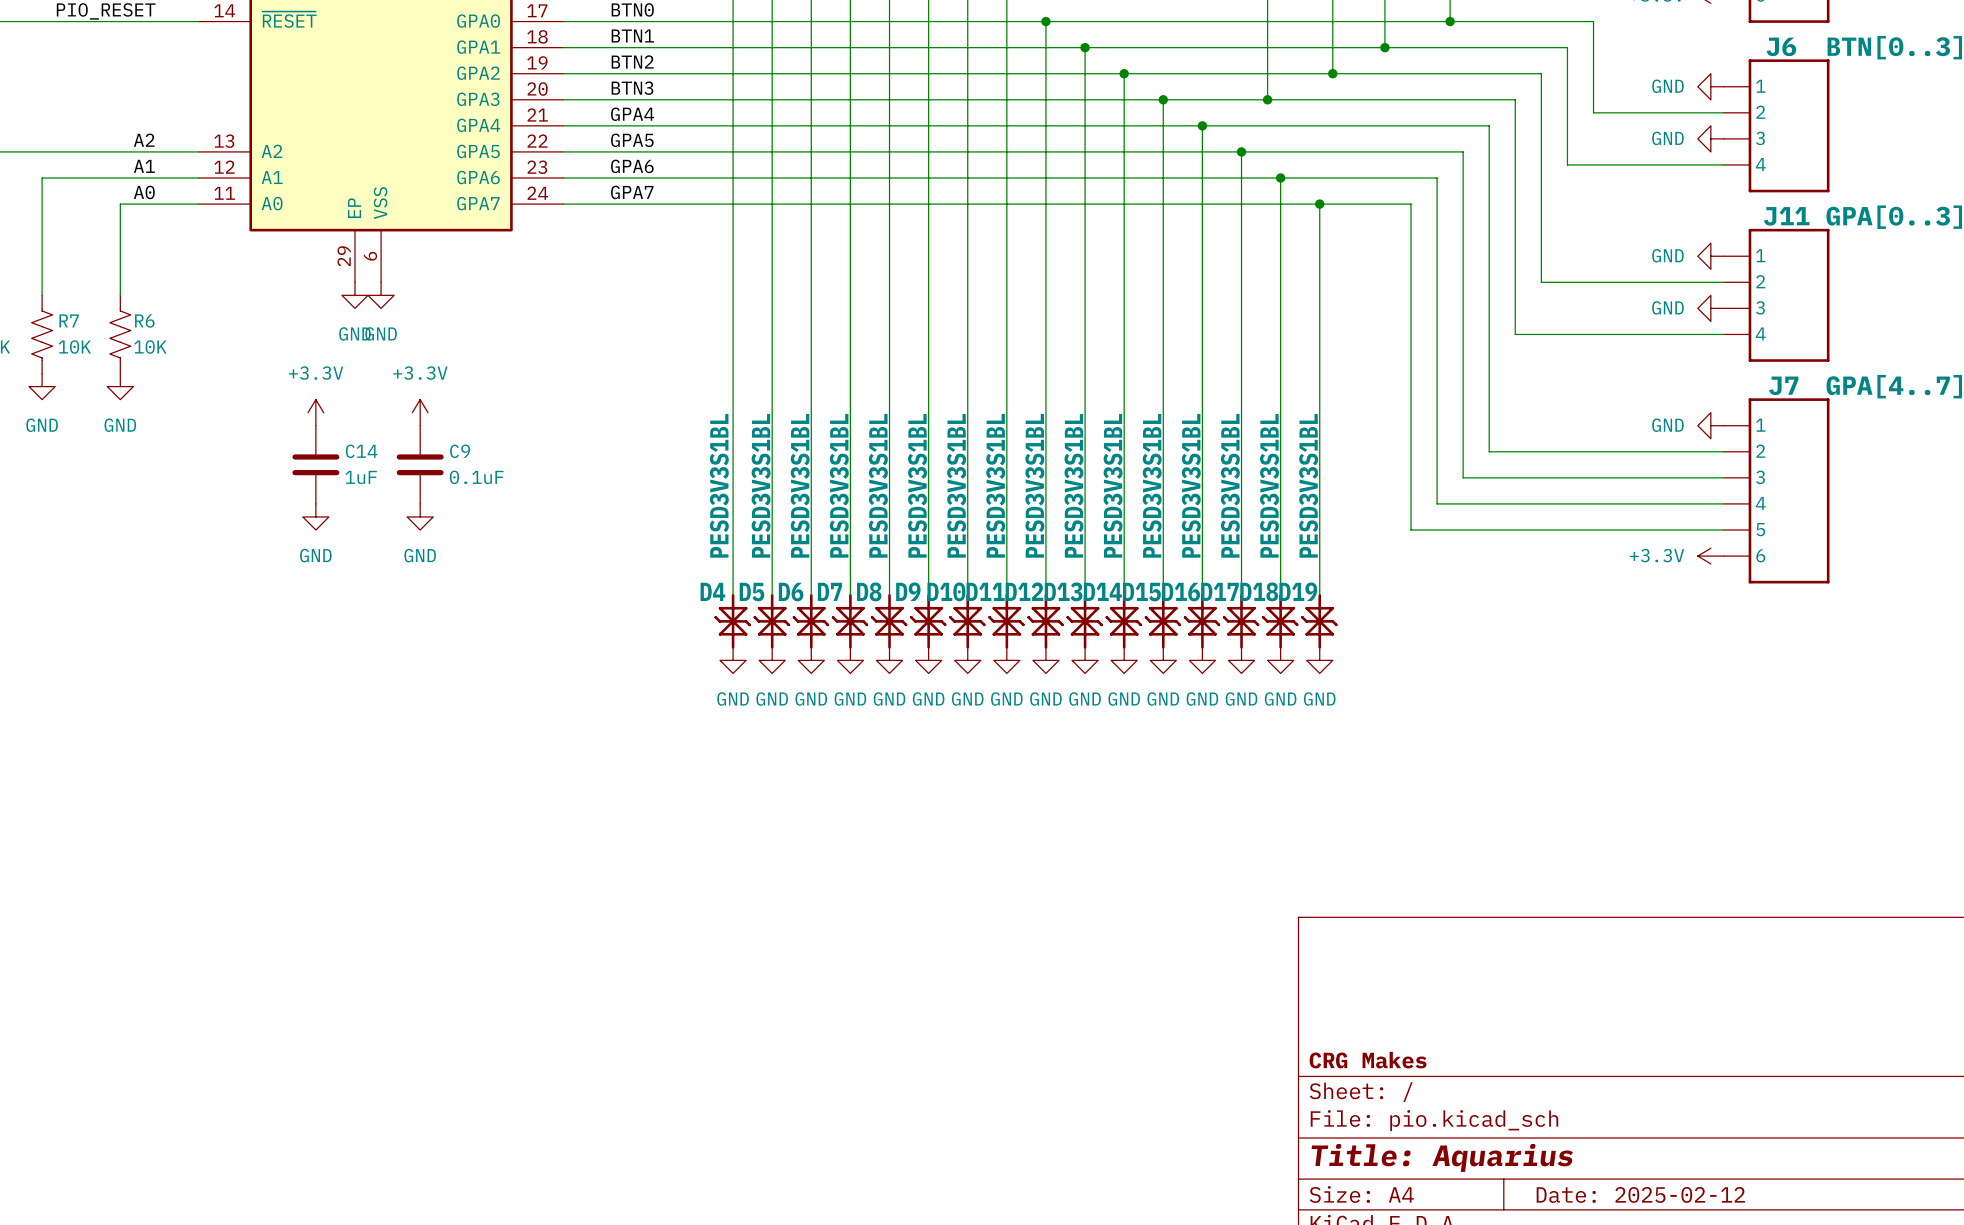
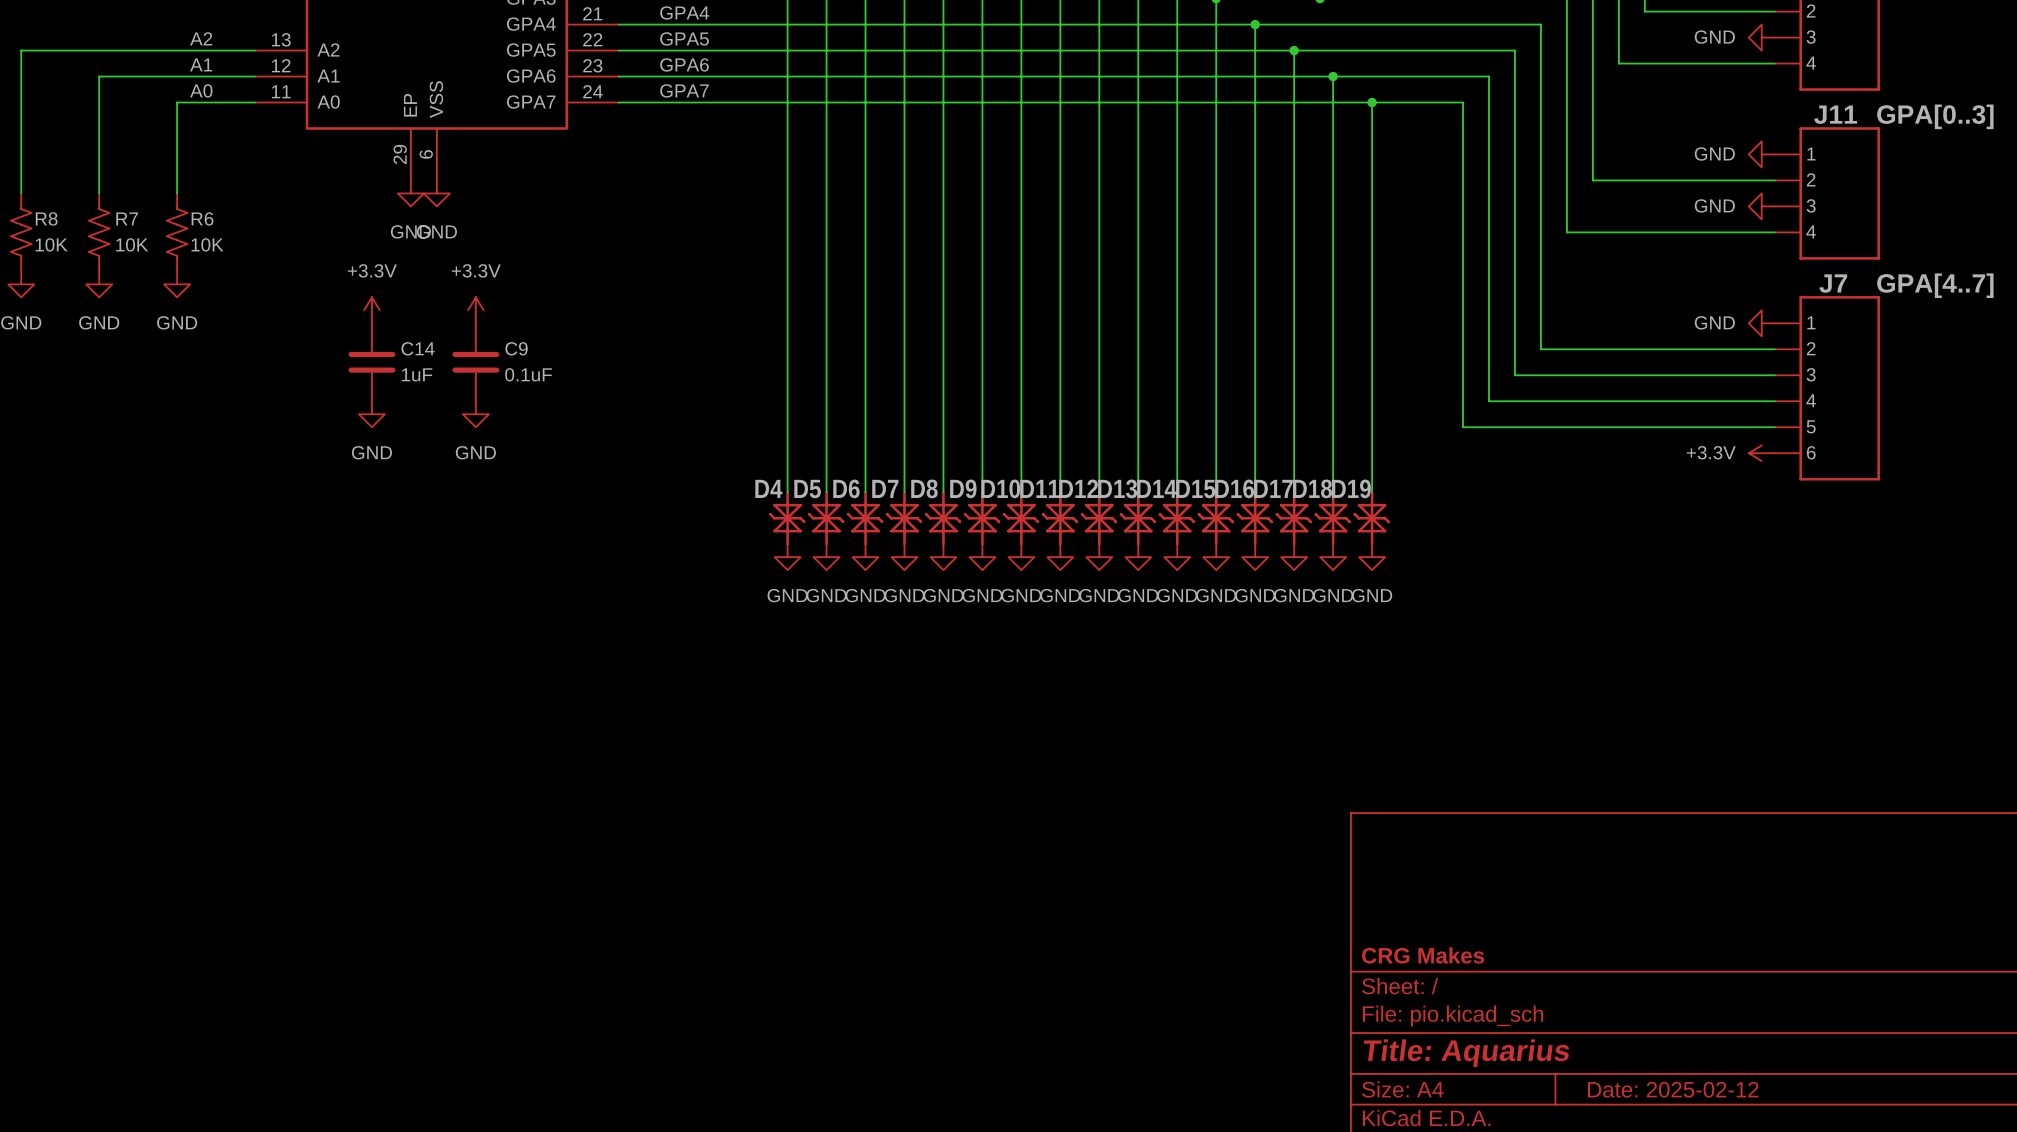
D4 value: PESD3V3S1BL (719, 485) -> none
D5 value: PESD3V3S1BL (761, 485) -> none
D6 value: PESD3V3S1BL (800, 485) -> none
D7 value: PESD3V3S1BL (839, 485) -> none
D8 value: PESD3V3S1BL (878, 485) -> none
D9 value: PESD3V3S1BL (917, 485) -> none
D10 value: PESD3V3S1BL (956, 485) -> none
D11 value: PESD3V3S1BL (995, 485) -> none
D12 value: PESD3V3S1BL (1034, 485) -> none
D13 value: PESD3V3S1BL (1073, 485) -> none
D14 value: PESD3V3S1BL (1113, 485) -> none
D15 value: PESD3V3S1BL (1152, 485) -> none
D16 value: PESD3V3S1BL (1191, 485) -> none
D17 value: PESD3V3S1BL (1230, 485) -> none
D18 value: PESD3V3S1BL (1269, 485) -> none
D19 value: PESD3V3S1BL (1308, 485) -> none

